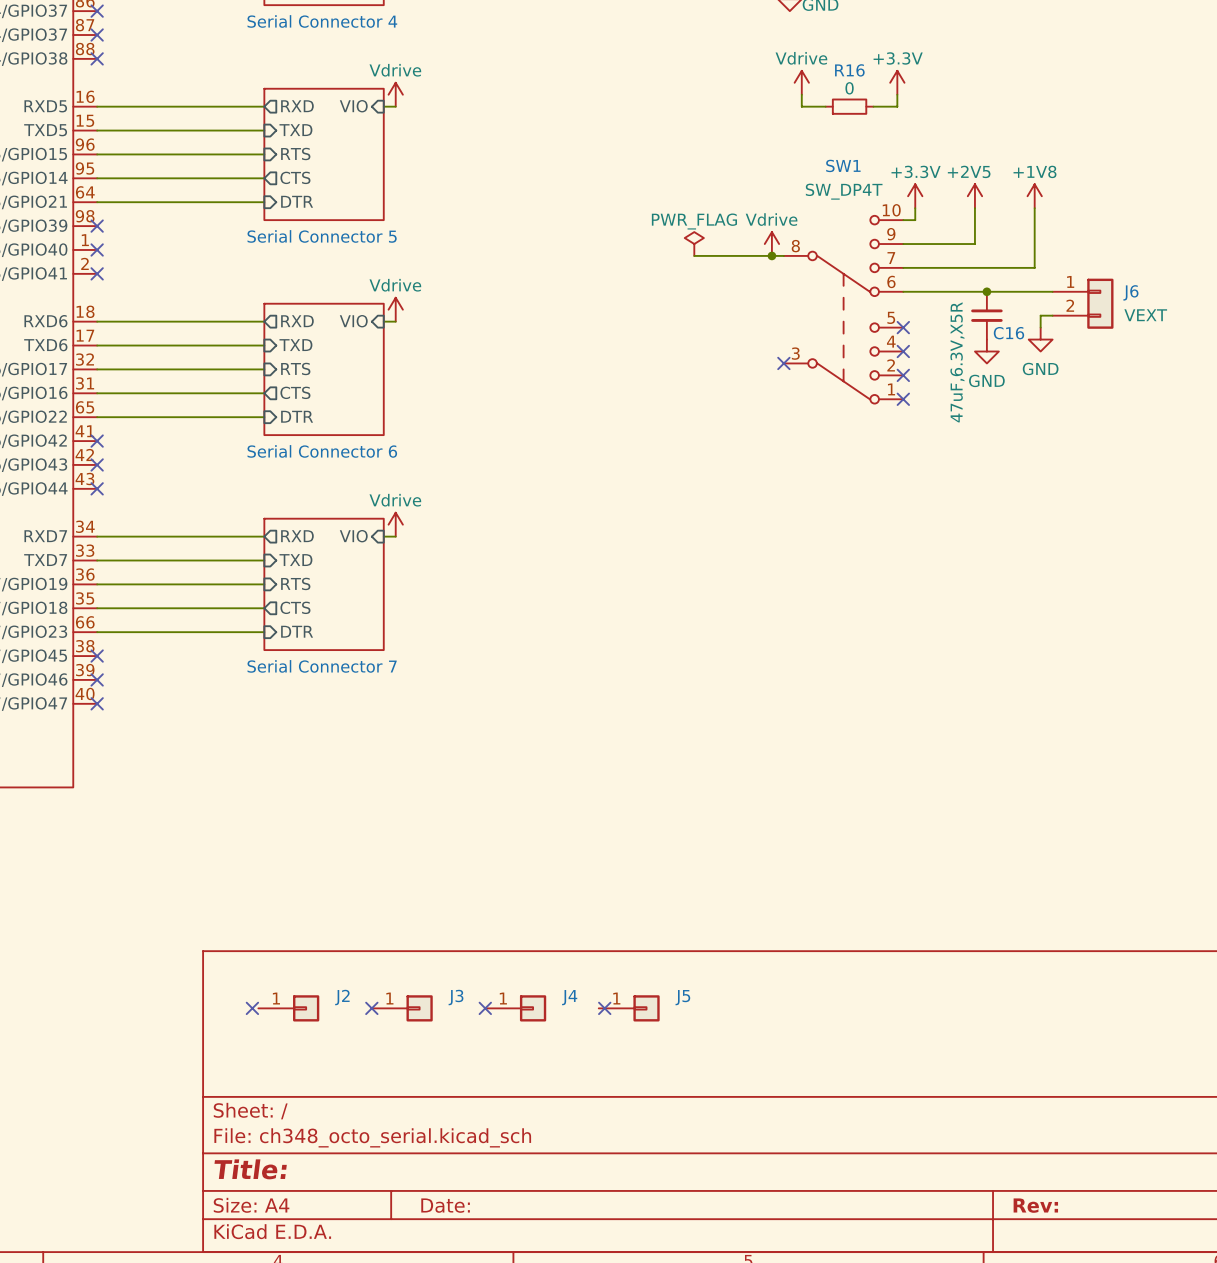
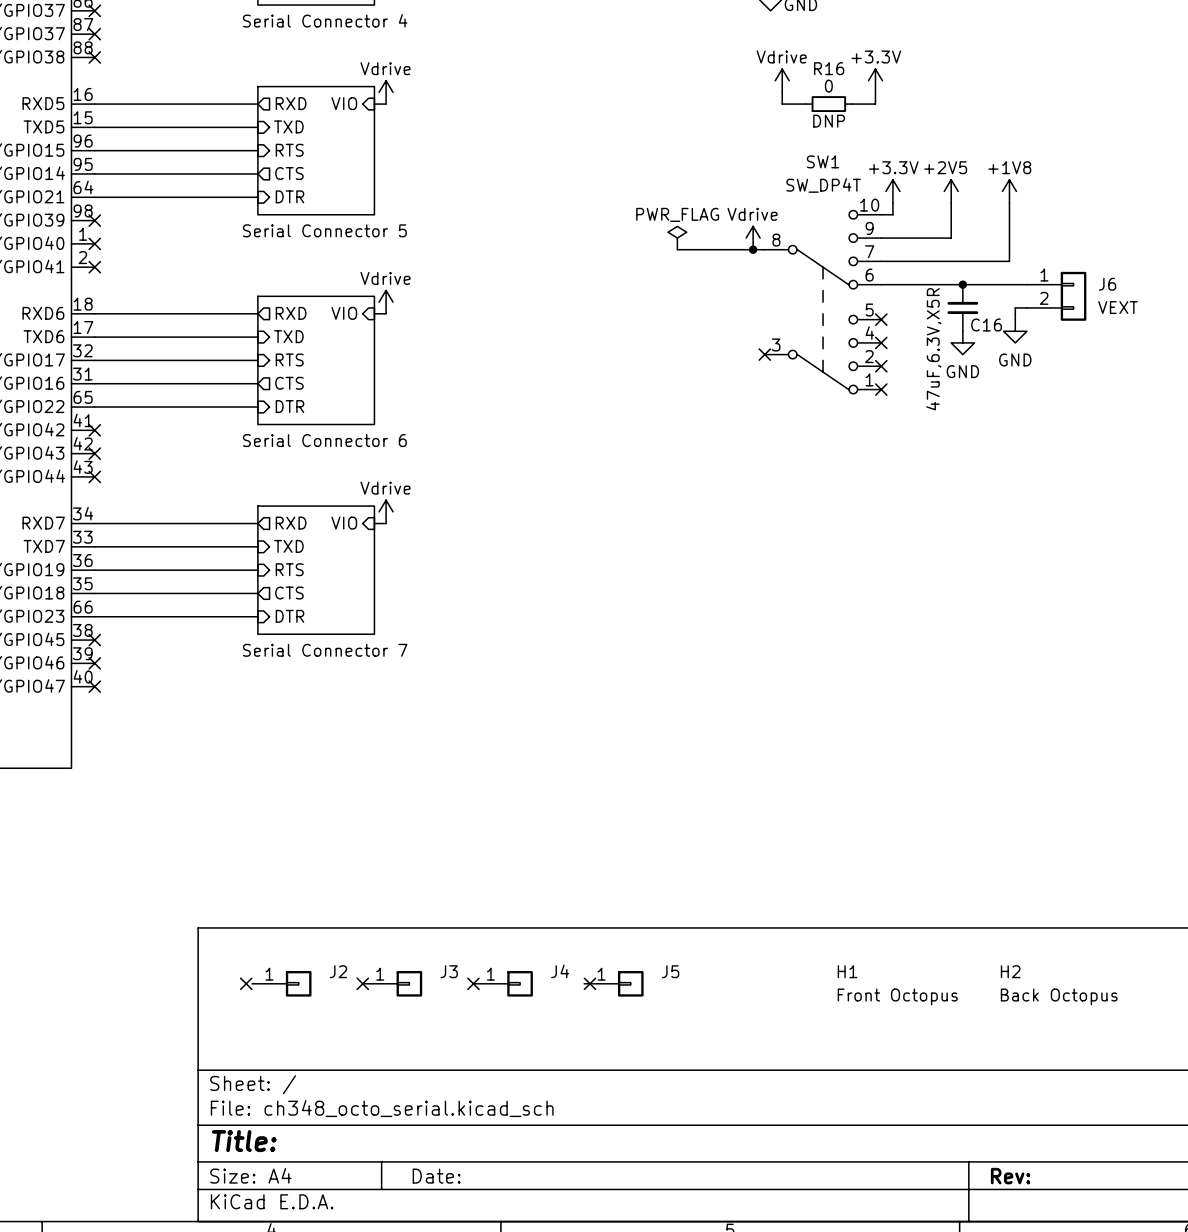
R16 text: none -> DNP (829, 121)
H1: none -> Front Octopus (897, 985)
H2: none -> Back Octopus (1059, 985)

